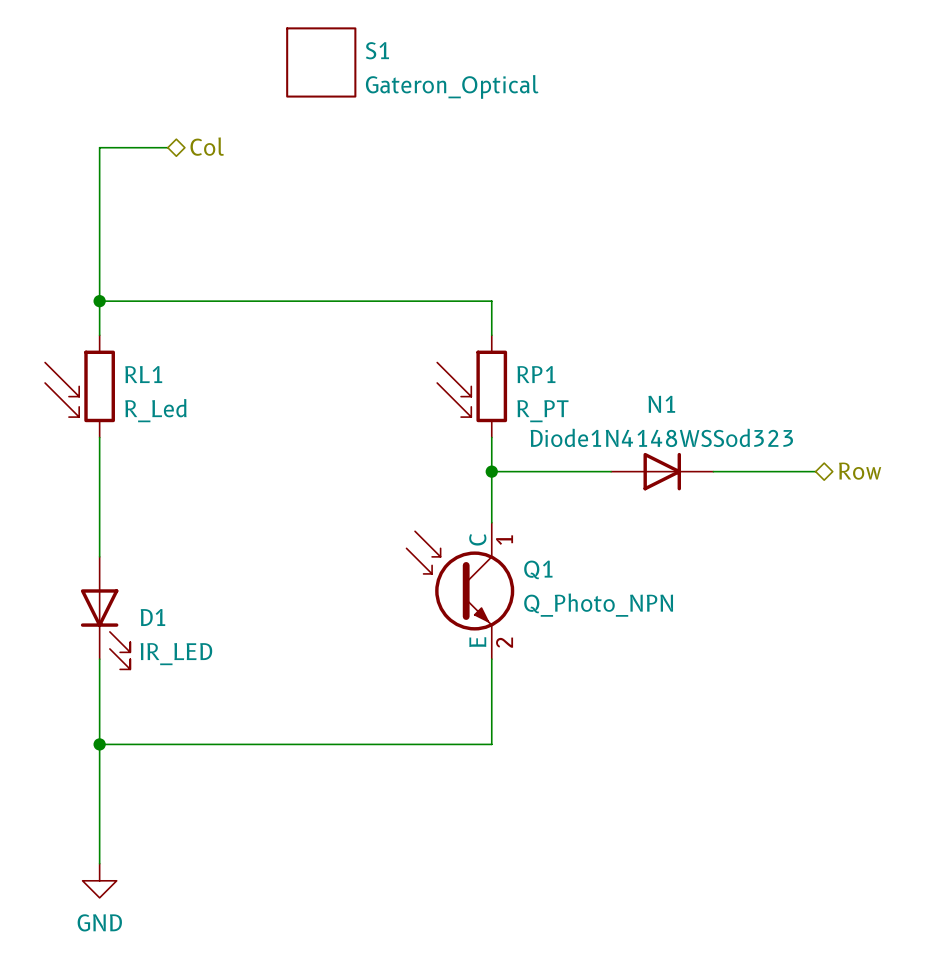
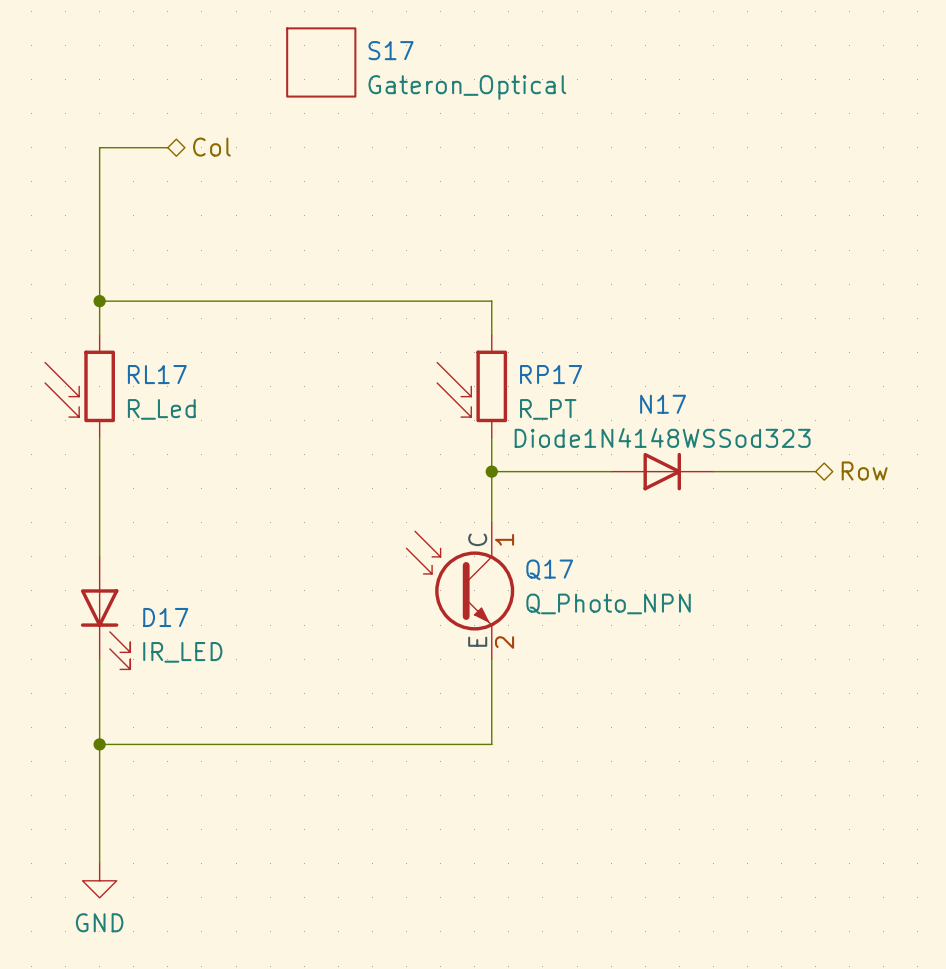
S1 name: S1 (377, 50) -> S17 (391, 50)
RL1 name: RL1 (143, 374) -> RL17 (157, 374)
RP1 name: RP1 (536, 374) -> RP17 (551, 374)
N1 name: N1 (661, 404) -> N17 (663, 404)
Q1 name: Q1 (538, 569) -> Q17 (549, 569)
D1 name: D1 (152, 617) -> D17 (165, 617)

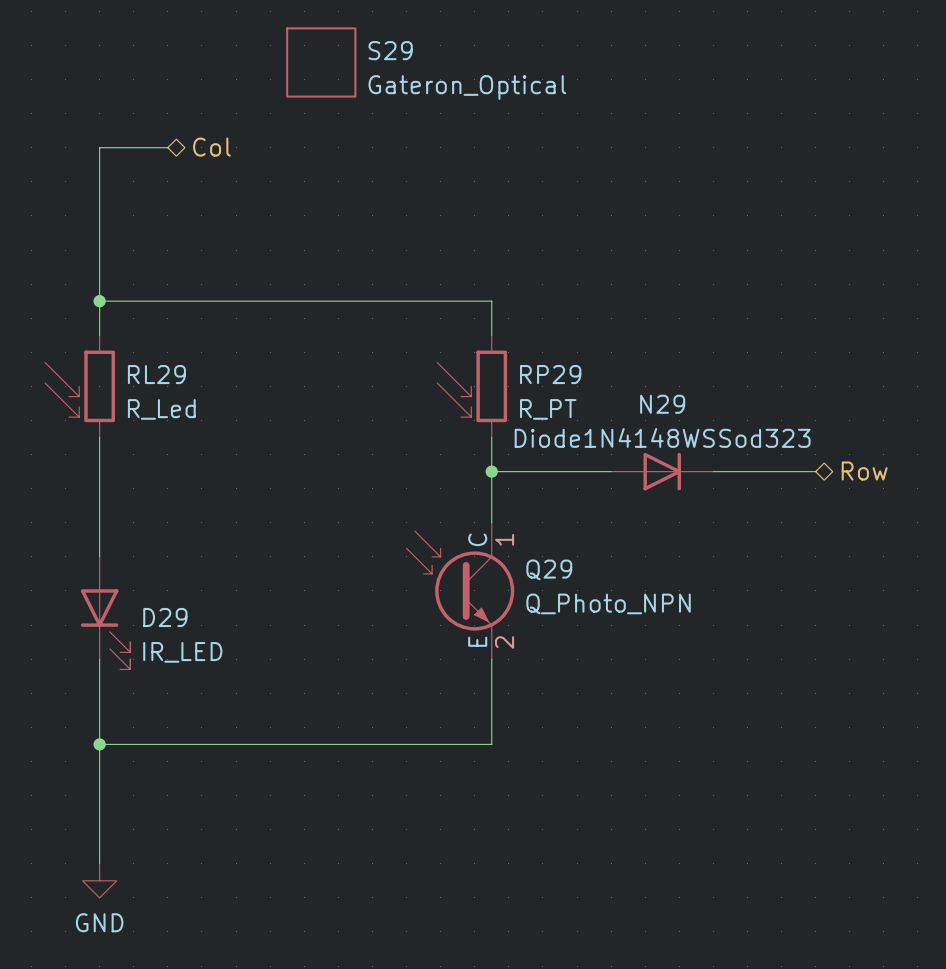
S17 name: S17 (391, 50) -> S29 (390, 50)
RL17 name: RL17 (157, 374) -> RL29 (156, 374)
RP17 name: RP17 (551, 374) -> RP29 (550, 374)
N17 name: N17 (663, 404) -> N29 (662, 404)
Q17 name: Q17 (549, 569) -> Q29 (549, 569)
D17 name: D17 (165, 617) -> D29 (165, 617)

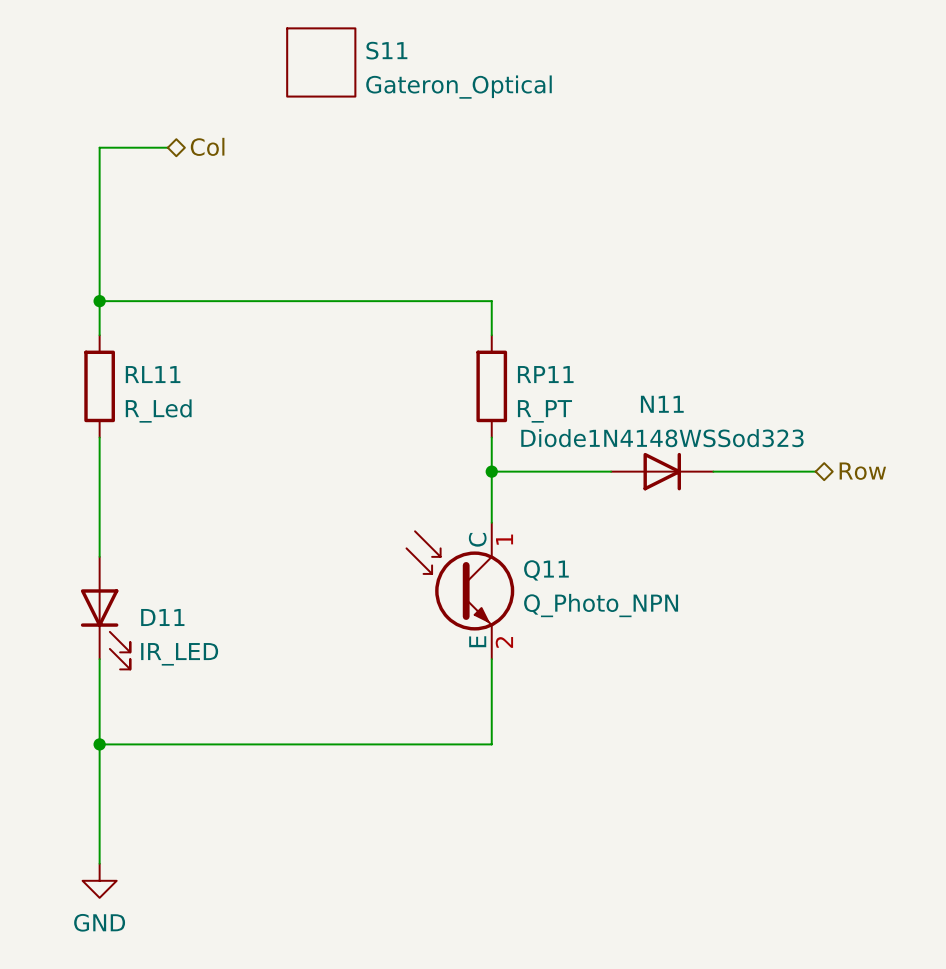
S29 name: S29 (390, 50) -> S11 (386, 50)
RL29: R_Led (80, 386) -> none
RL11: none -> R_Led (99, 386)
RP29: R_PT (472, 386) -> none
RP11: none -> R_PT (491, 386)
N29 name: N29 (662, 404) -> N11 (662, 404)
Q29 name: Q29 (549, 569) -> Q11 (546, 570)
D29 name: D29 (165, 617) -> D11 (162, 617)

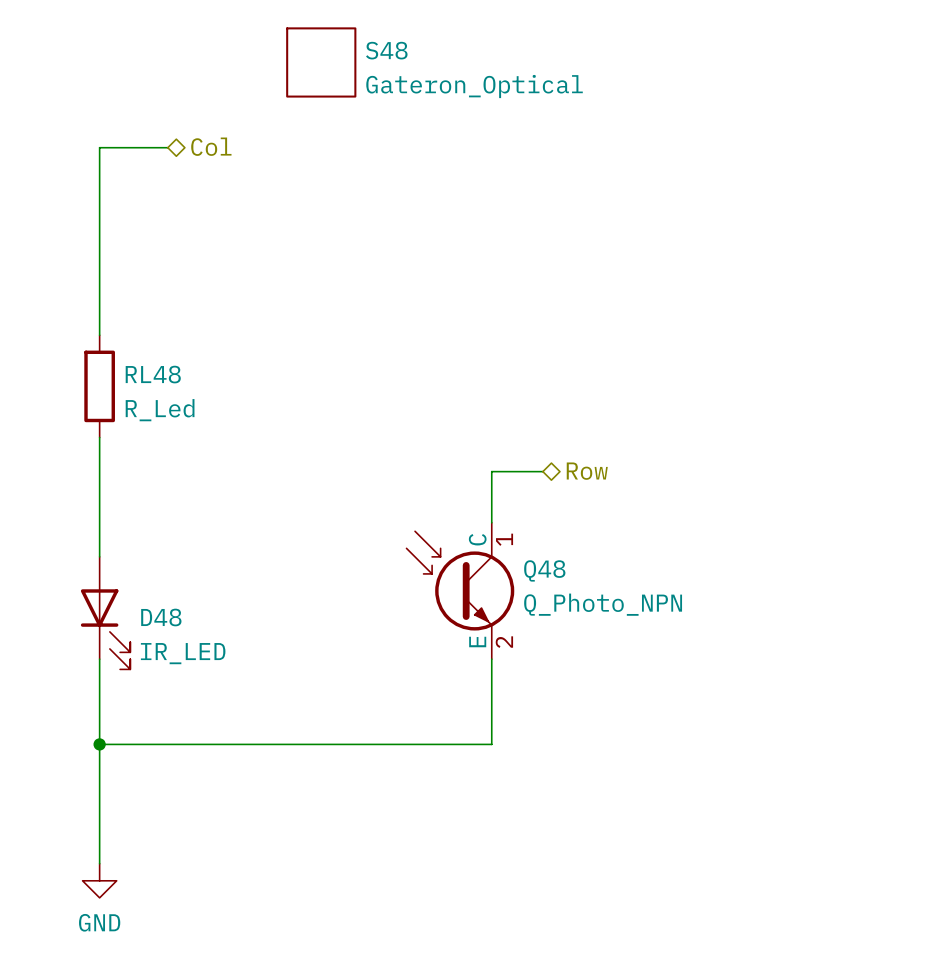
S11 name: S11 (386, 50) -> S48 (386, 50)
wire: (99, 301) (491, 301) (491, 335) -> none
junction: (99, 301) -> none
RL11 name: RL11 (153, 374) -> RL48 (153, 374)
RP11: R_PT (491, 386) -> none
wire: (491, 437) (491, 471) -> none
junction: (491, 471) -> none
wire: (542, 471) (611, 471) -> none
N11: Diode1N4148WSSod323 (662, 471) -> none
wire: (713, 471) (815, 471) -> none
hierarchical label position: Row (862, 471) -> Row (587, 471)
Q11 name: Q11 (546, 570) -> Q48 (544, 570)
D11 name: D11 (162, 617) -> D48 (161, 617)

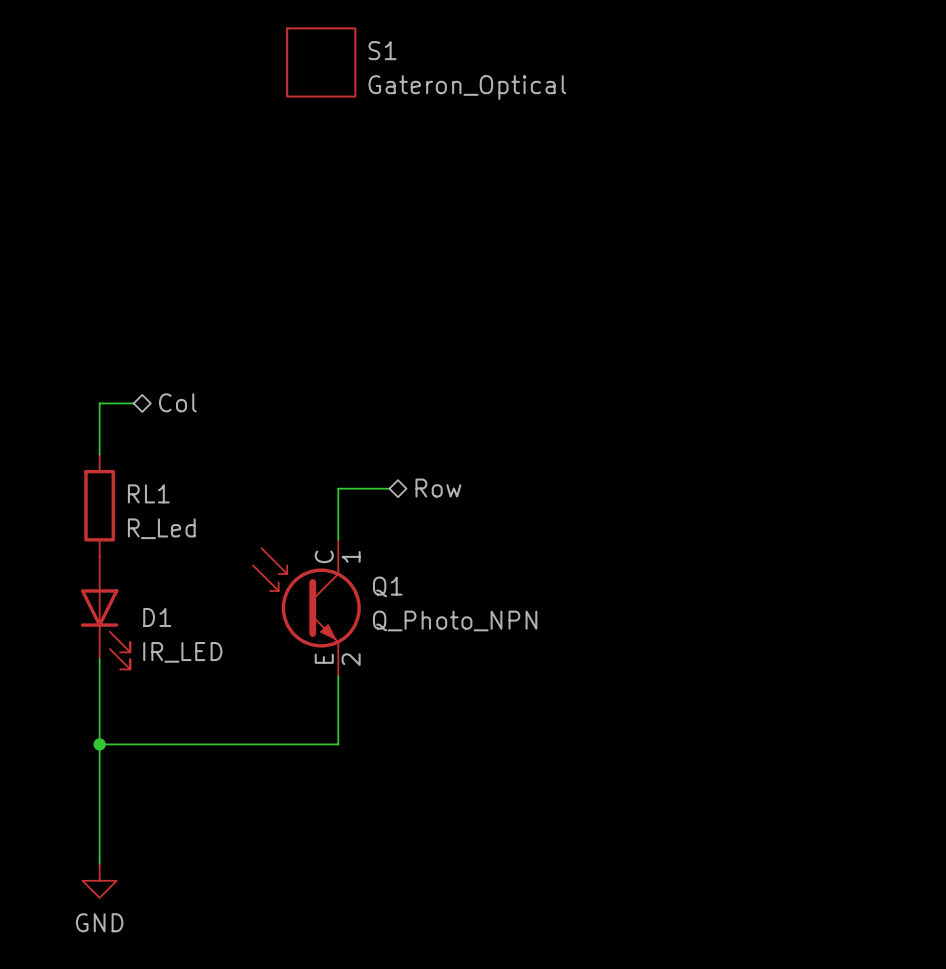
S48 name: S48 (386, 50) -> S1 (382, 50)
hierarchical label position: Col (211, 146) -> Col (177, 402)
wire: (167, 147) (99, 147) (99, 335) -> none
RL48: R_Led (99, 386) -> none
wire: none -> (133, 403) (99, 403) (99, 437)
wire: (99, 454) (99, 556) -> none
wire: (542, 471) (491, 471) (491, 522) -> (389, 488) (338, 488) (338, 539)
hierarchical label position: Row (587, 471) -> Row (438, 488)
RL1: none -> R_Led (99, 505)
Q48: Q_Photo_NPN (460, 590) -> none
Q1: none -> Q_Photo_NPN (306, 608)
D48 name: D48 (161, 617) -> D1 (157, 617)
wire: (491, 659) (491, 744) (338, 744) -> (338, 676) (338, 744)

